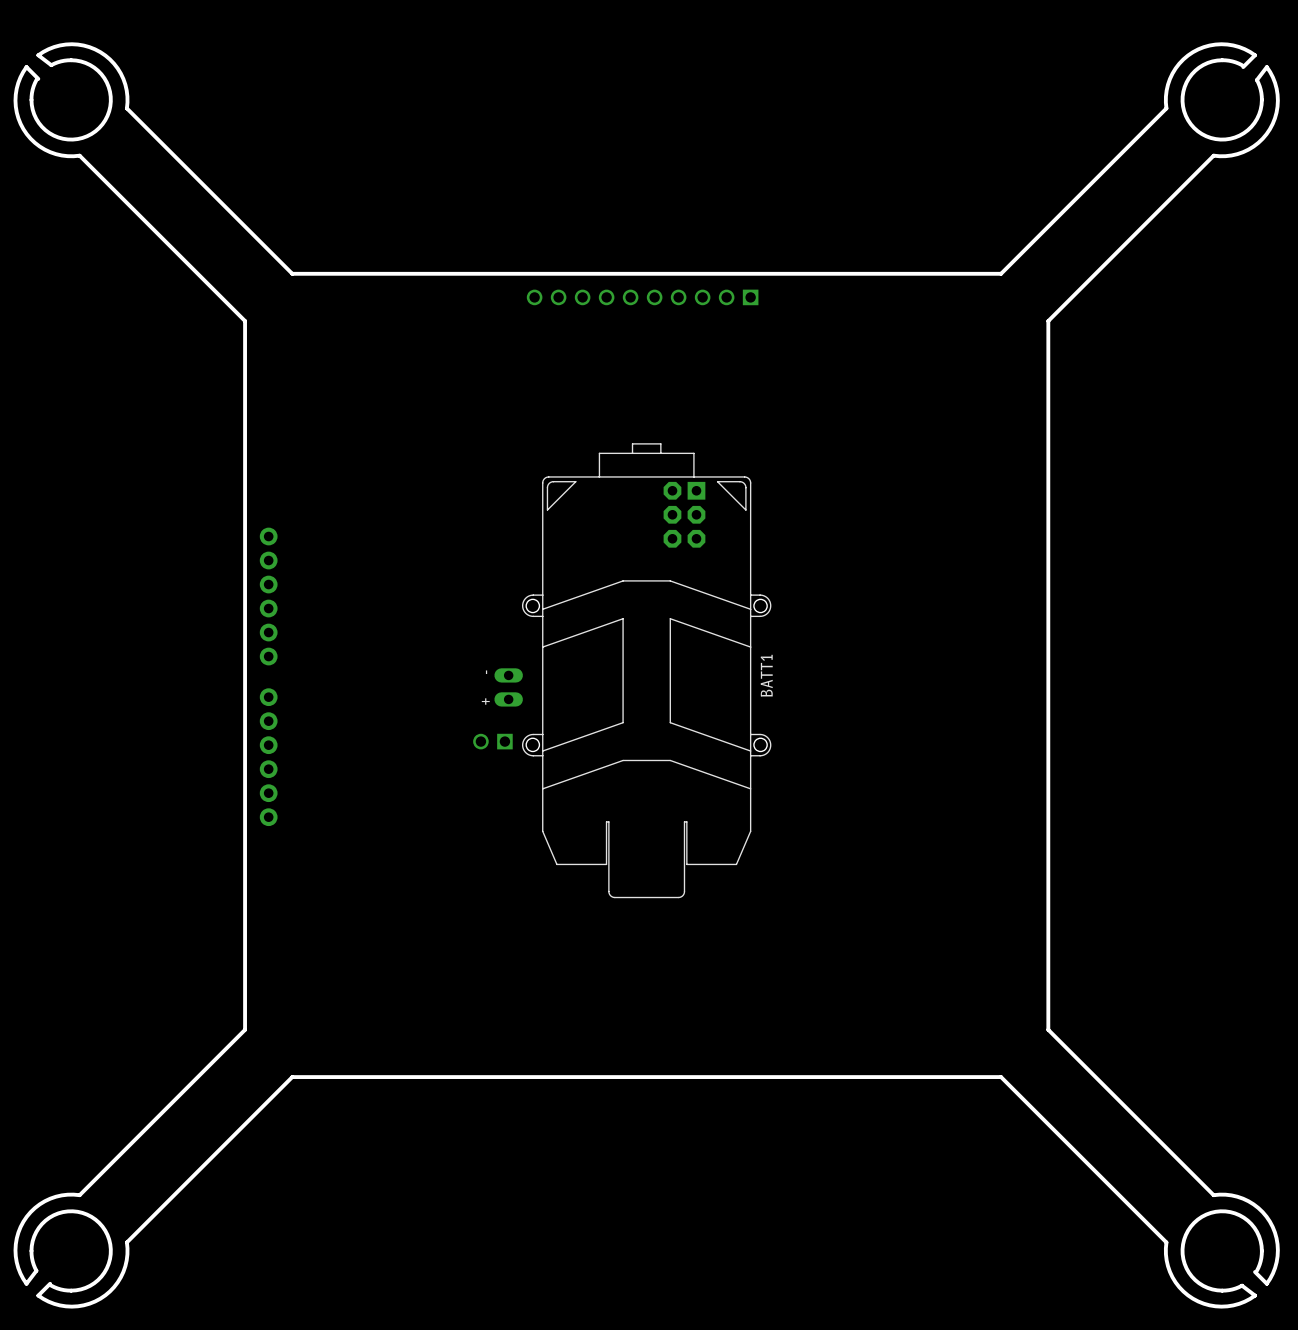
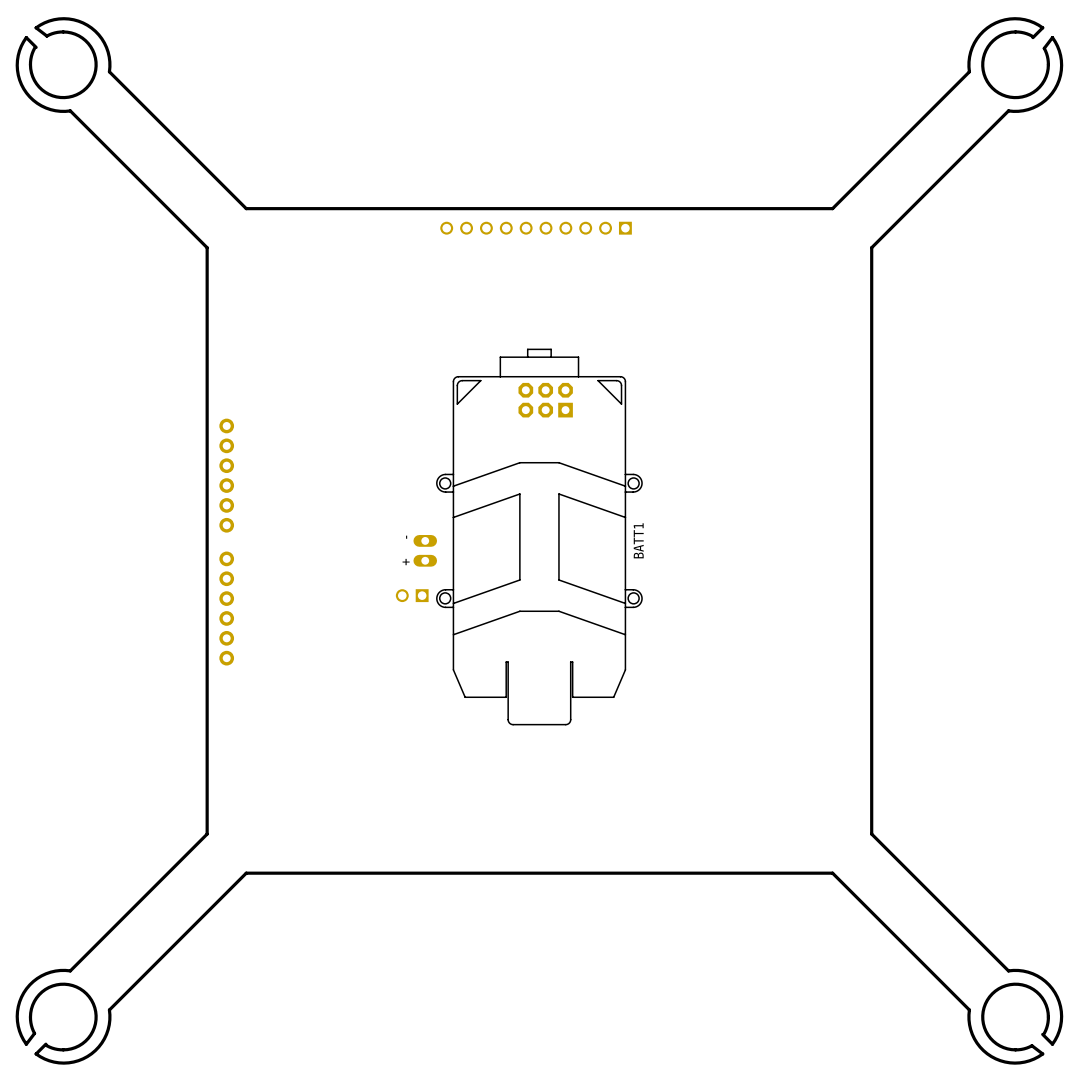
part rotation: 0° (684, 514) -> 90° clockwise (545, 400)

